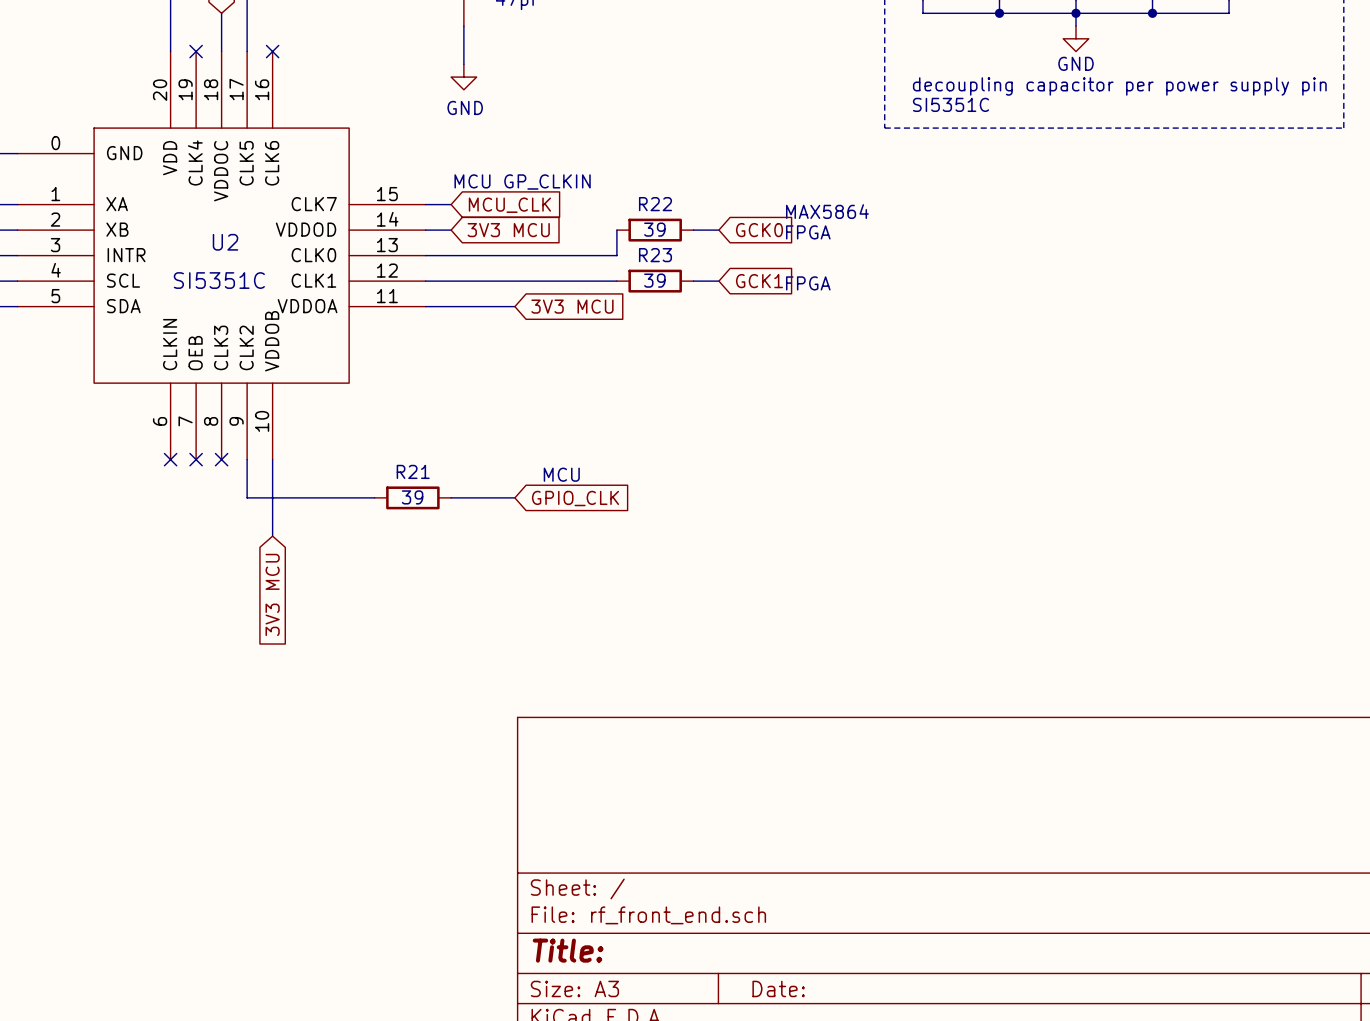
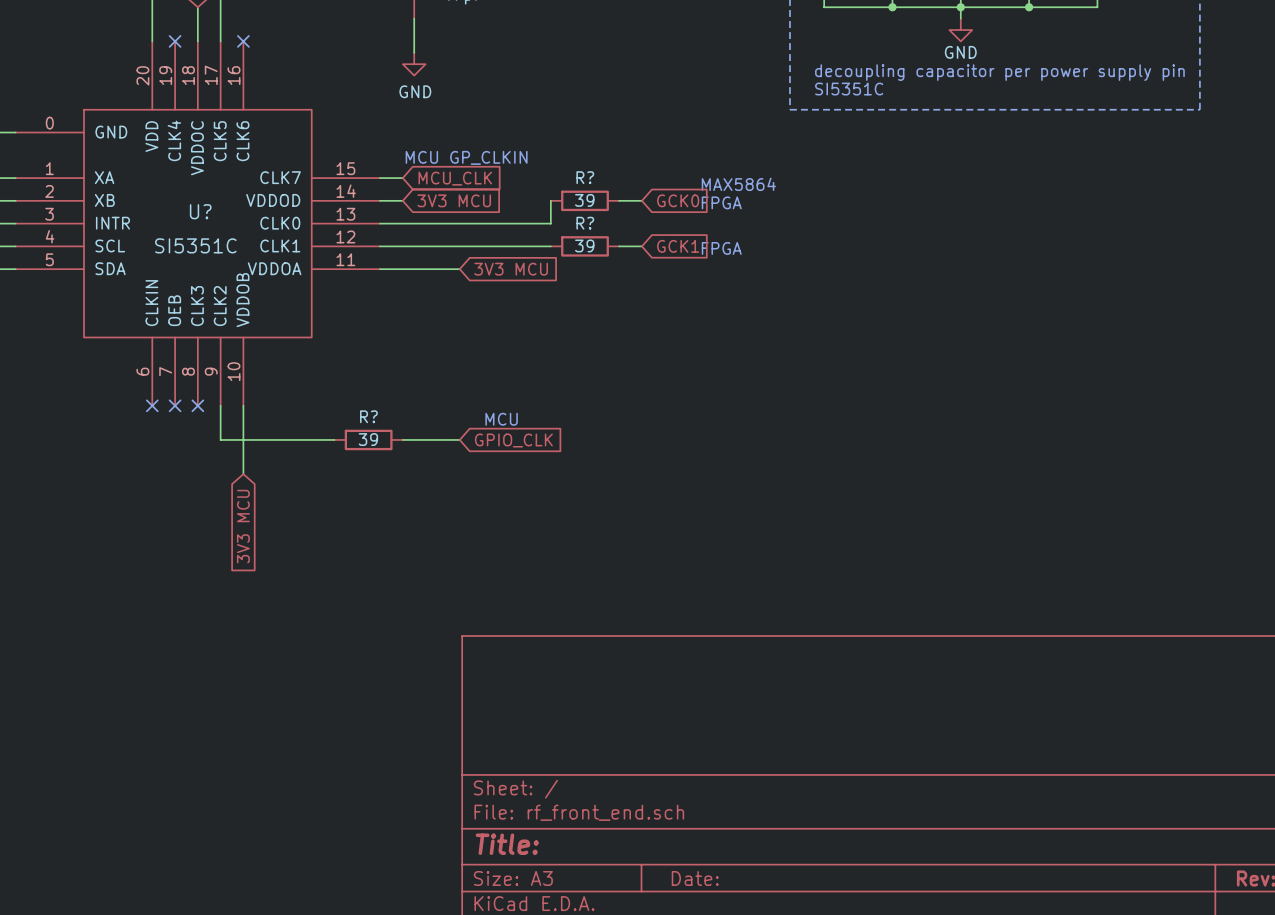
R22 name: R22 (655, 204) -> R? (585, 177)
U2 name: U2 (225, 242) -> U? (200, 211)
R23 name: R23 (655, 255) -> R? (585, 223)
R21 name: R21 (413, 471) -> R? (368, 416)

